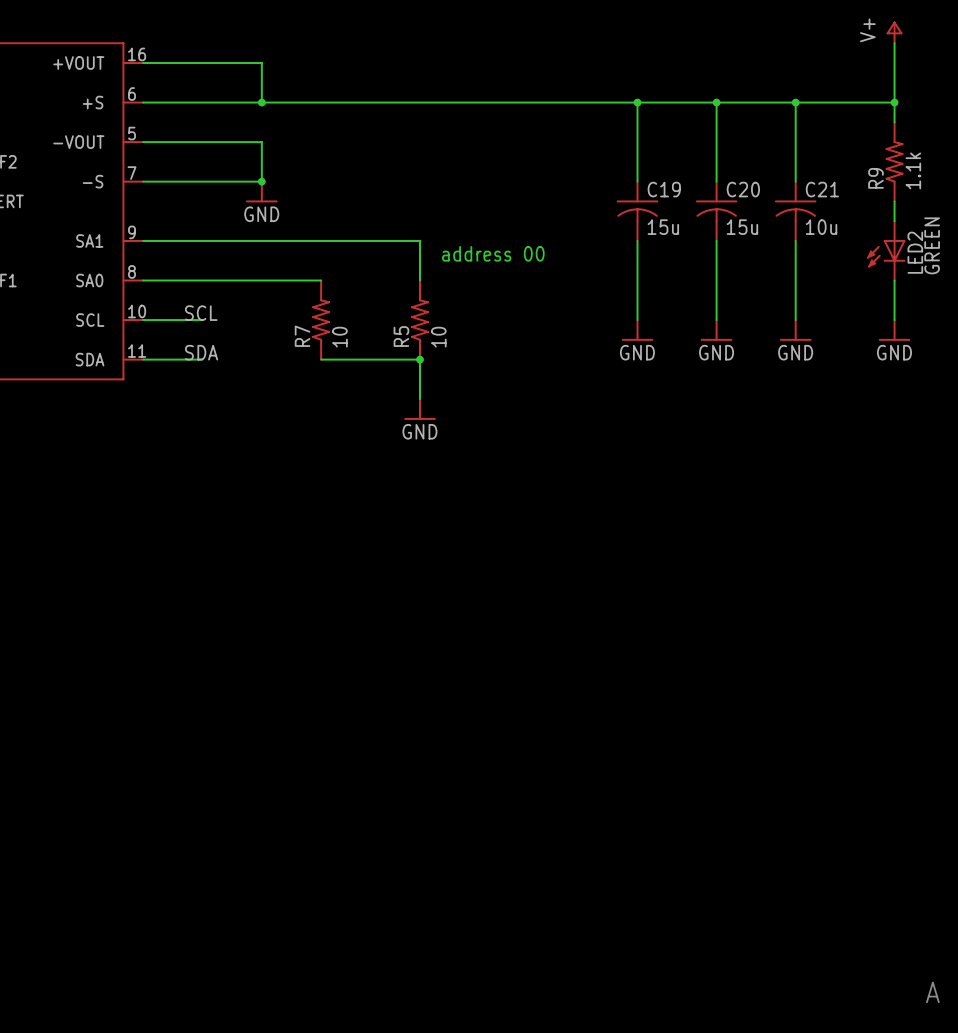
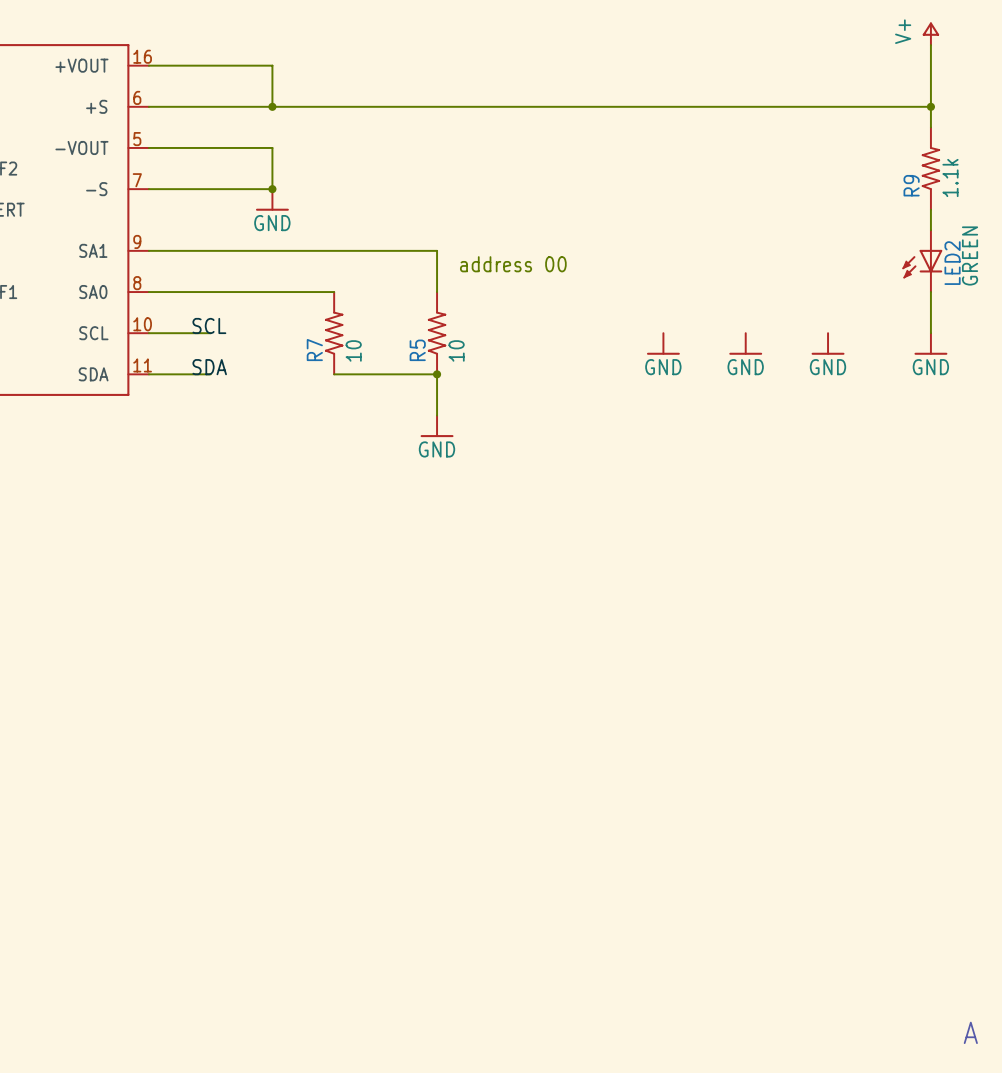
wire: (637, 102) (637, 181) -> none
junction: (637, 102) -> none
wire: (716, 102) (716, 181) -> none
junction: (716, 102) -> none
wire: (795, 102) (795, 181) -> none
junction: (795, 102) -> none
C19: 15u (637, 211) -> none
C20: 15u (716, 211) -> none
C21: 10u (795, 211) -> none
wire: (637, 240) (637, 320) -> none
wire: (716, 240) (716, 320) -> none
wire: (795, 240) (795, 320) -> none

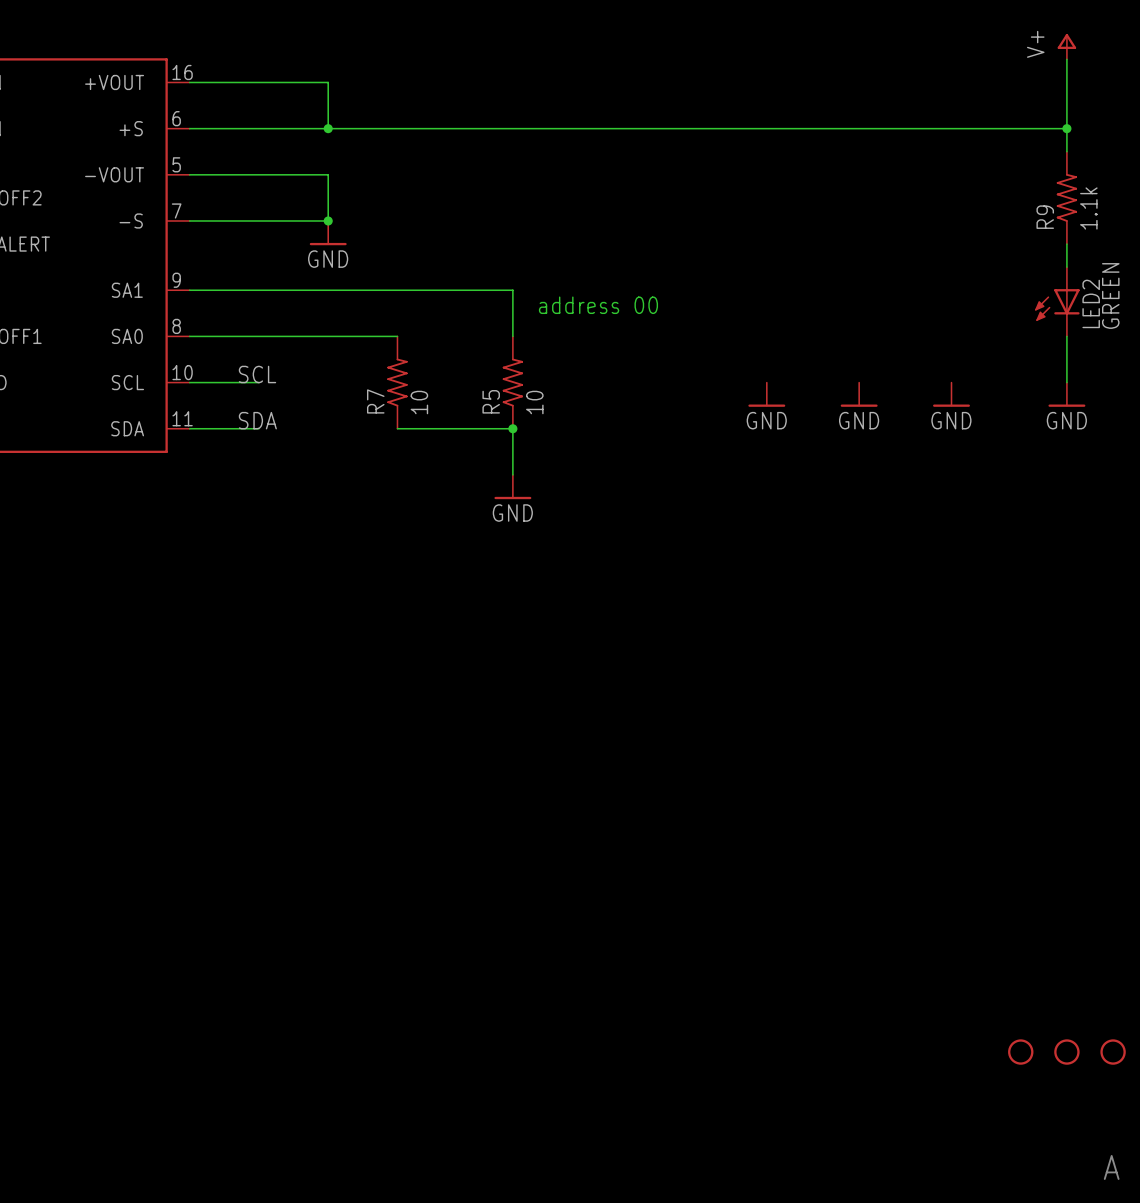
part: none -> (1020, 1052)
part: none -> (1066, 1052)
part: none -> (1113, 1052)

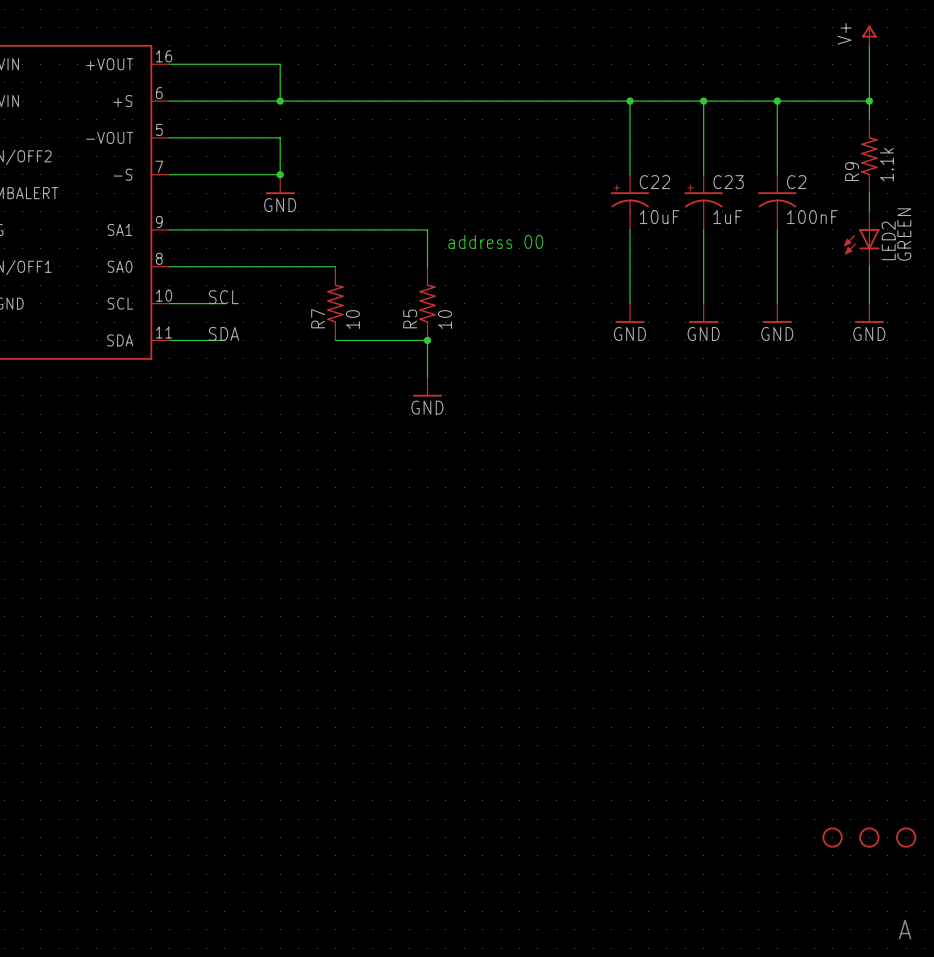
wire: none -> (630, 101) (630, 174)
junction: none -> (630, 101)
wire: none -> (703, 101) (703, 174)
junction: none -> (703, 101)
wire: none -> (777, 101) (777, 174)
junction: none -> (777, 101)
C22: none -> 10uF (630, 202)
C23: none -> 1uF (703, 202)
C2: none -> 100nF (777, 202)
wire: none -> (630, 229) (630, 303)
wire: none -> (703, 229) (703, 303)
wire: none -> (777, 229) (777, 303)

